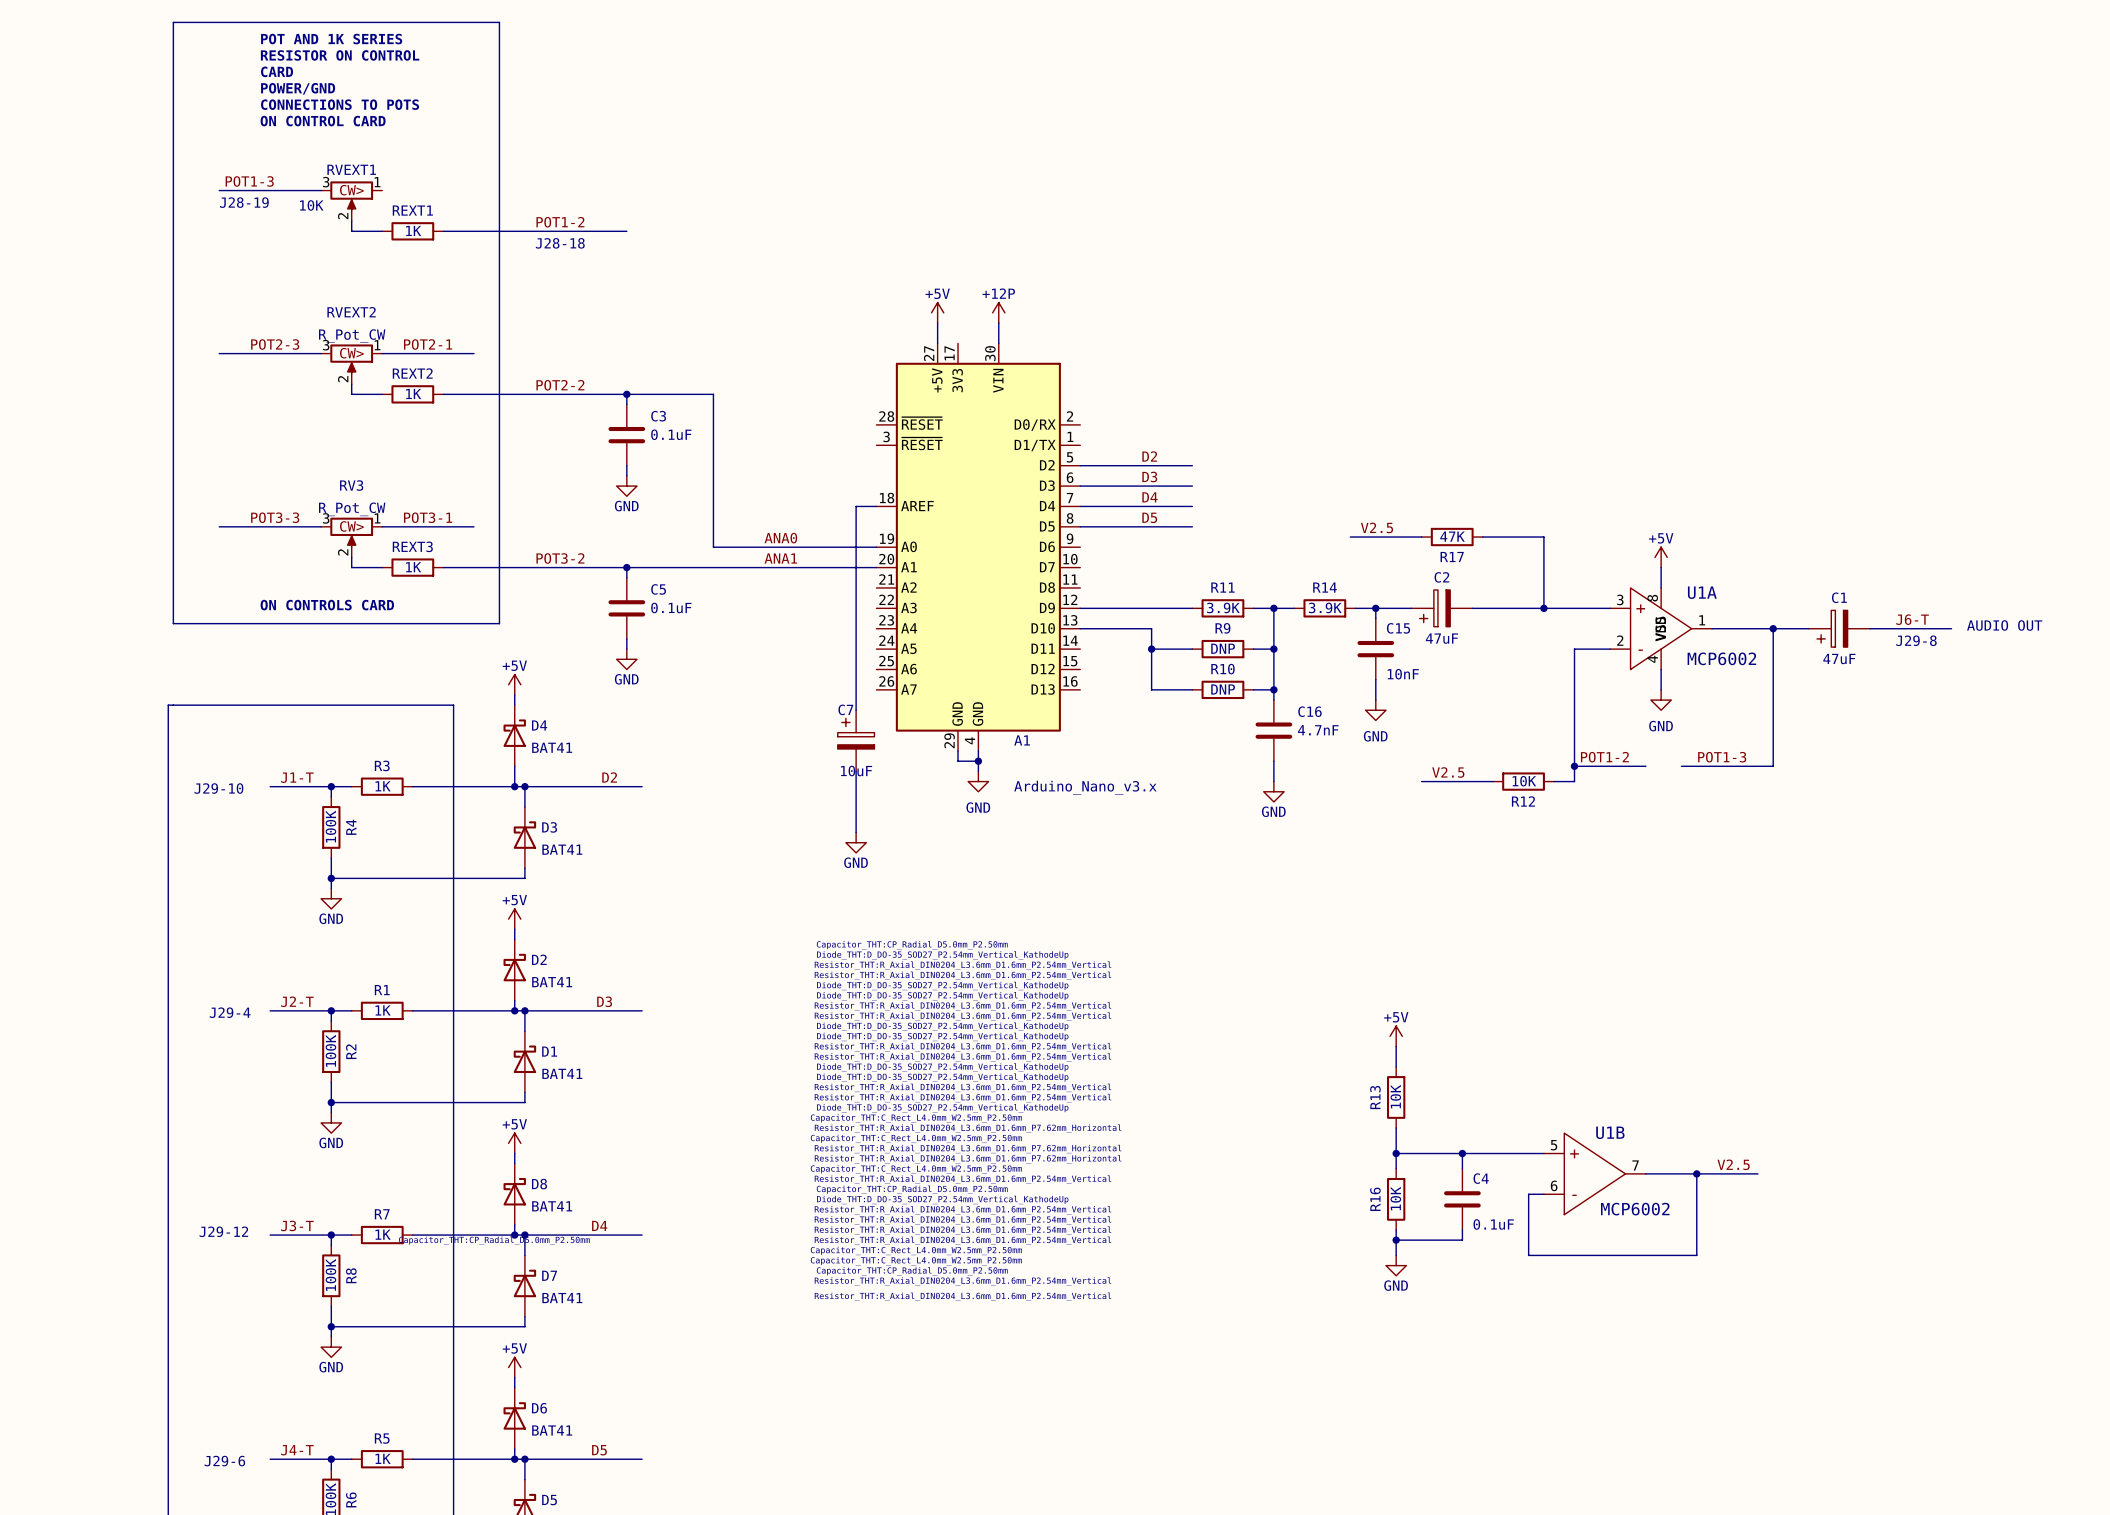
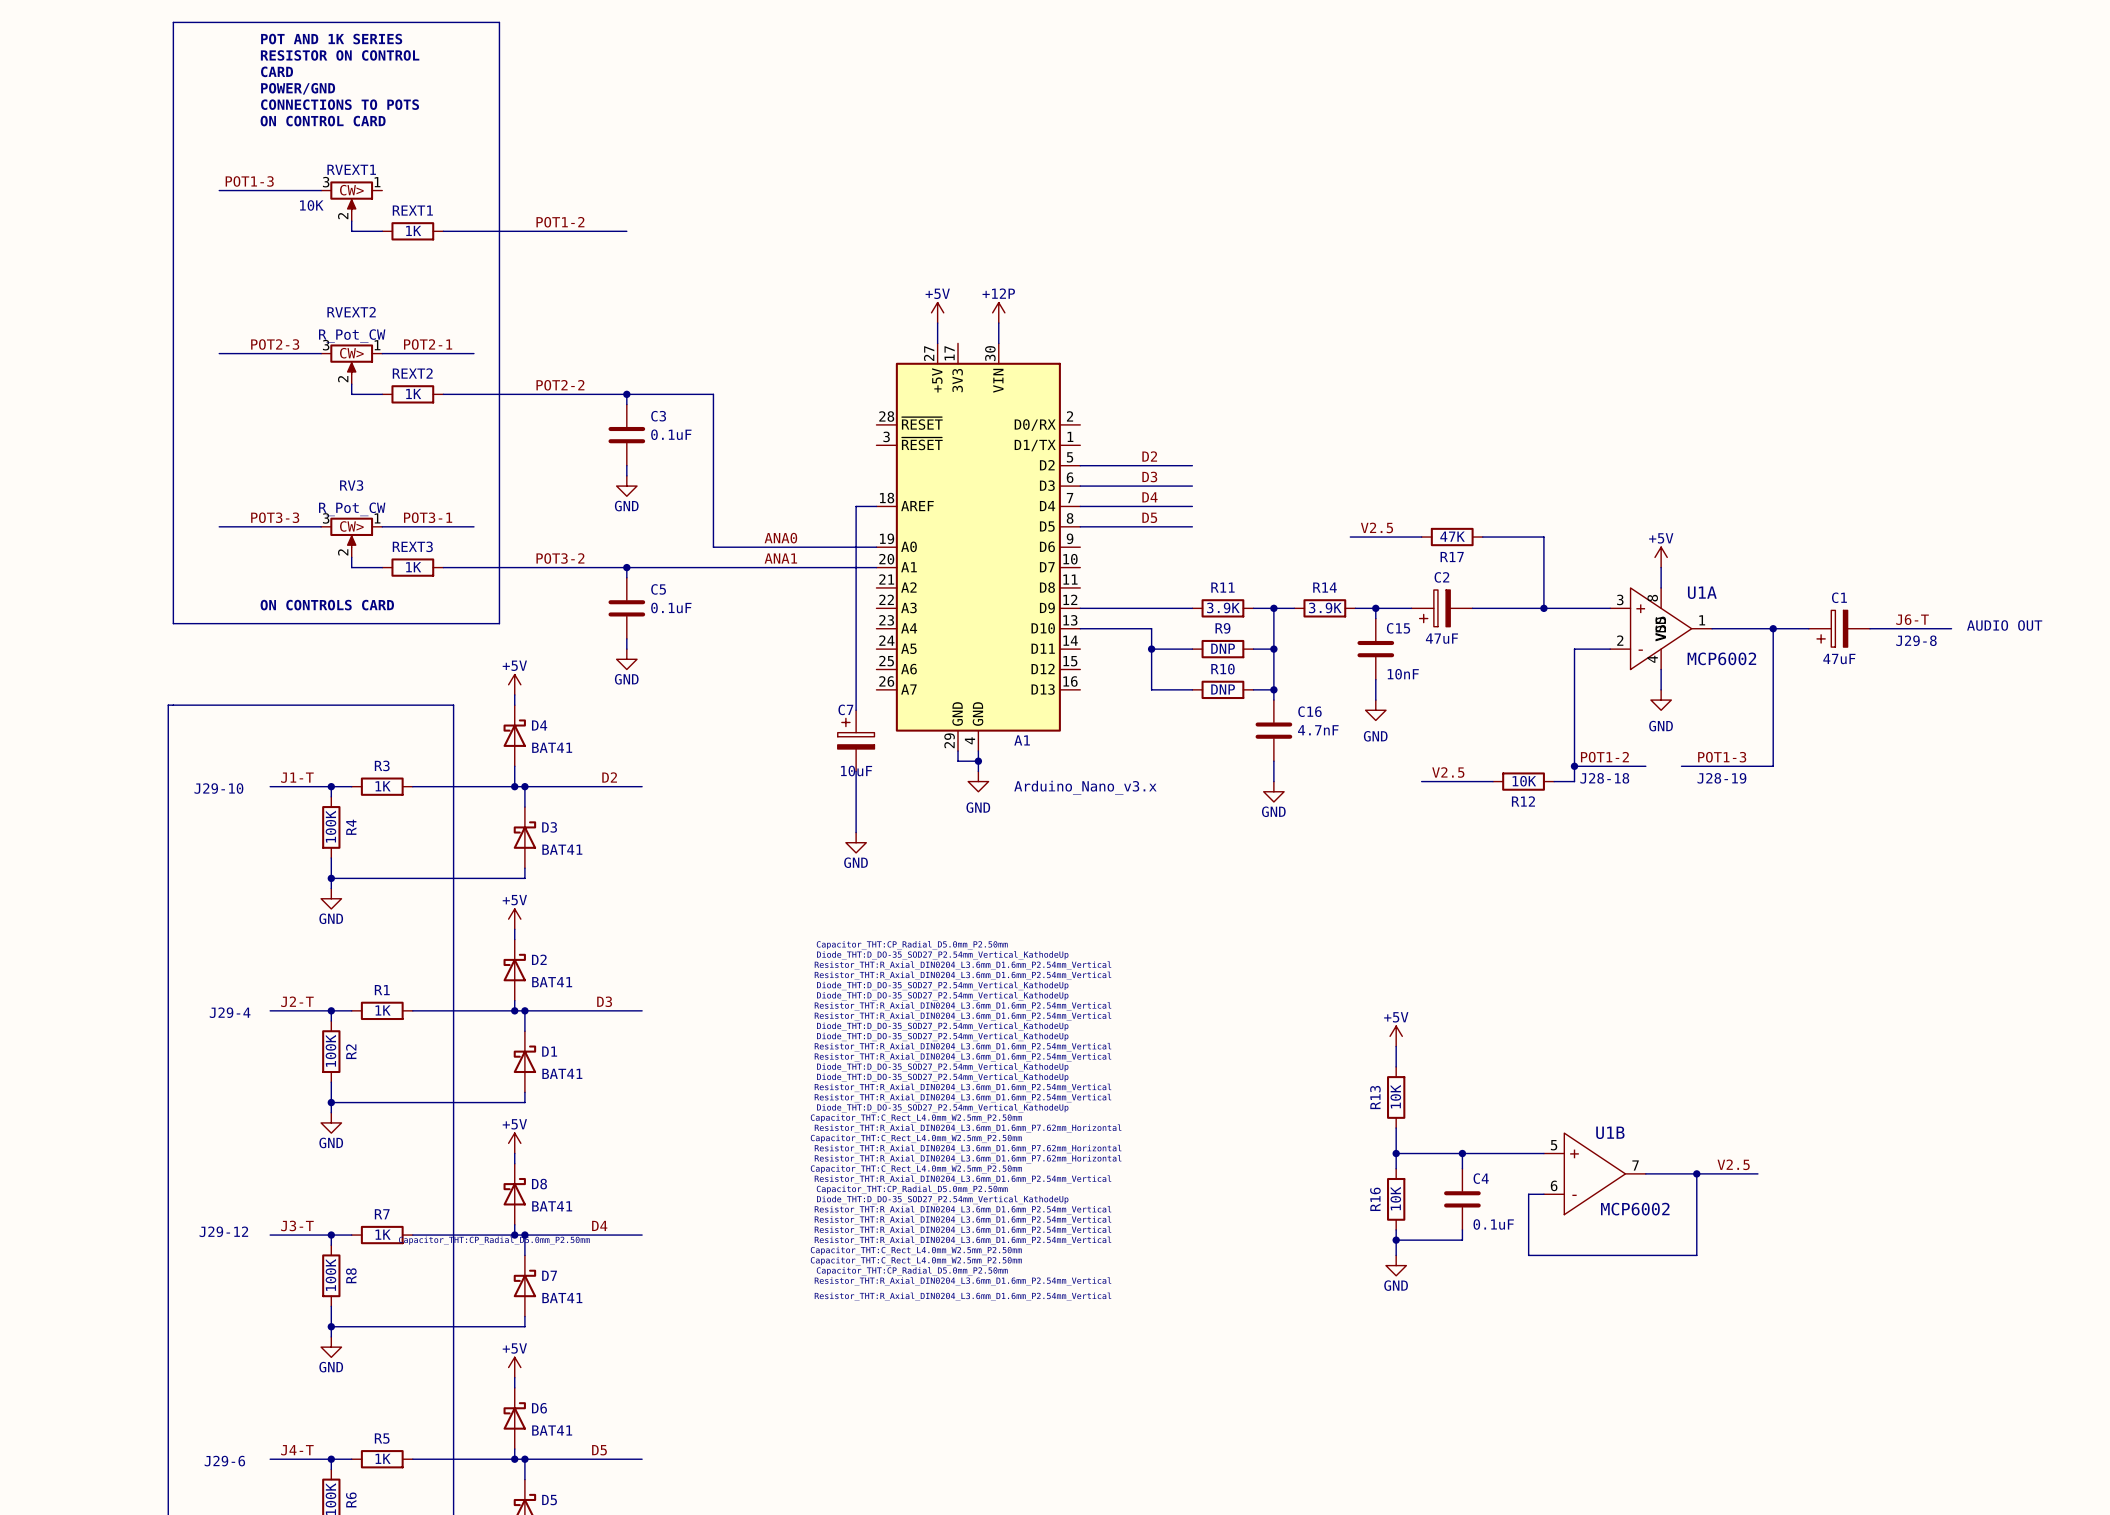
text: J28-19 (244, 202) -> none
text: J28-18 (560, 243) -> none
text: none -> J28-18 (1604, 778)
text: none -> J28-19 (1721, 778)

